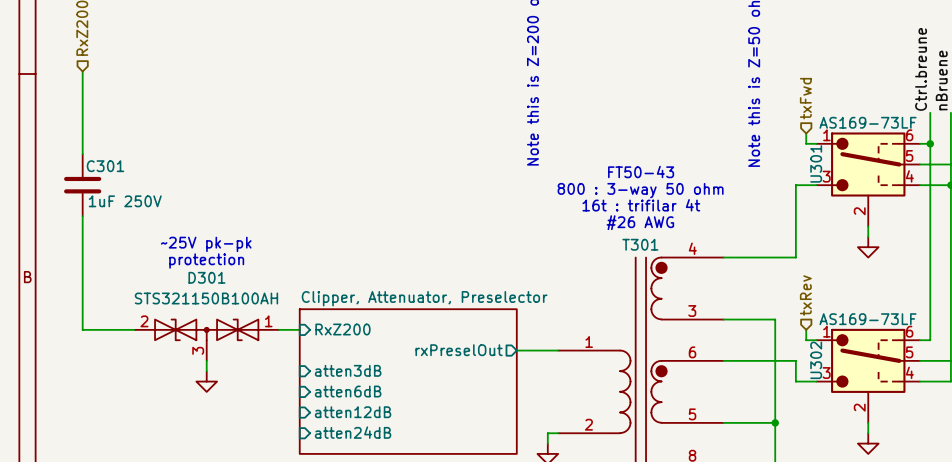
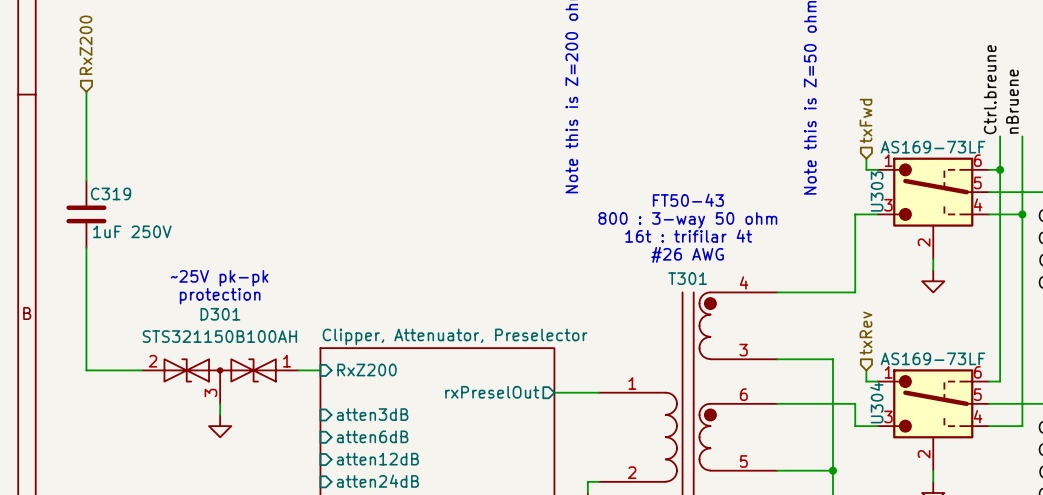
U301 name: U301 (816, 163) -> U303 (877, 191)
C301 name: C301 (105, 166) -> C319 (111, 193)
U302 name: U302 (816, 360) -> U304 (876, 402)

